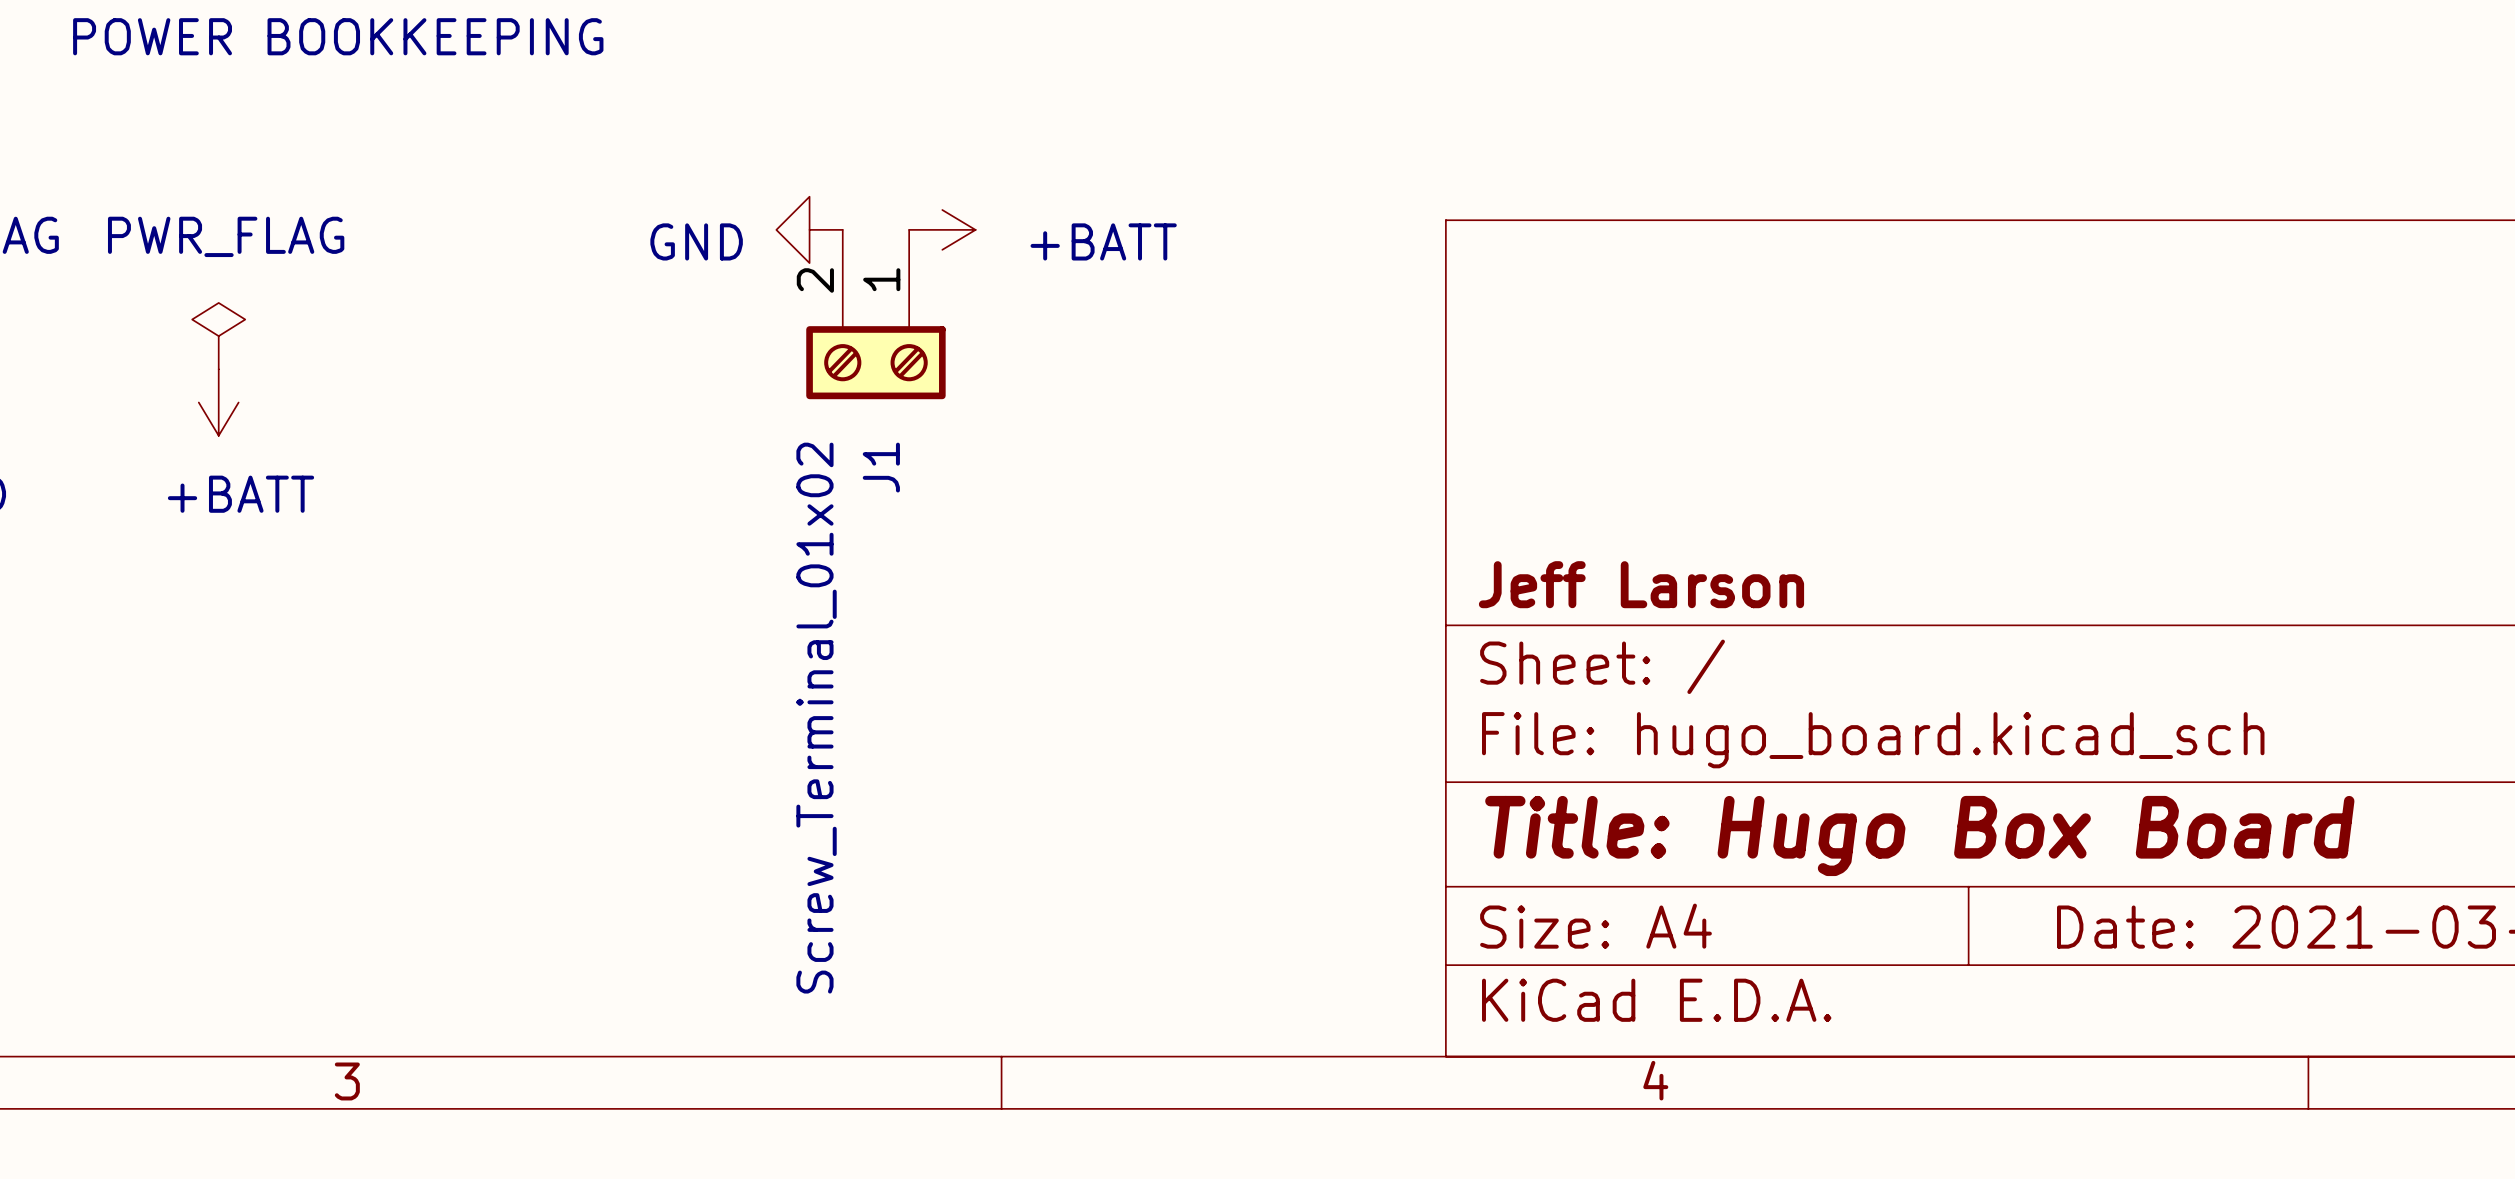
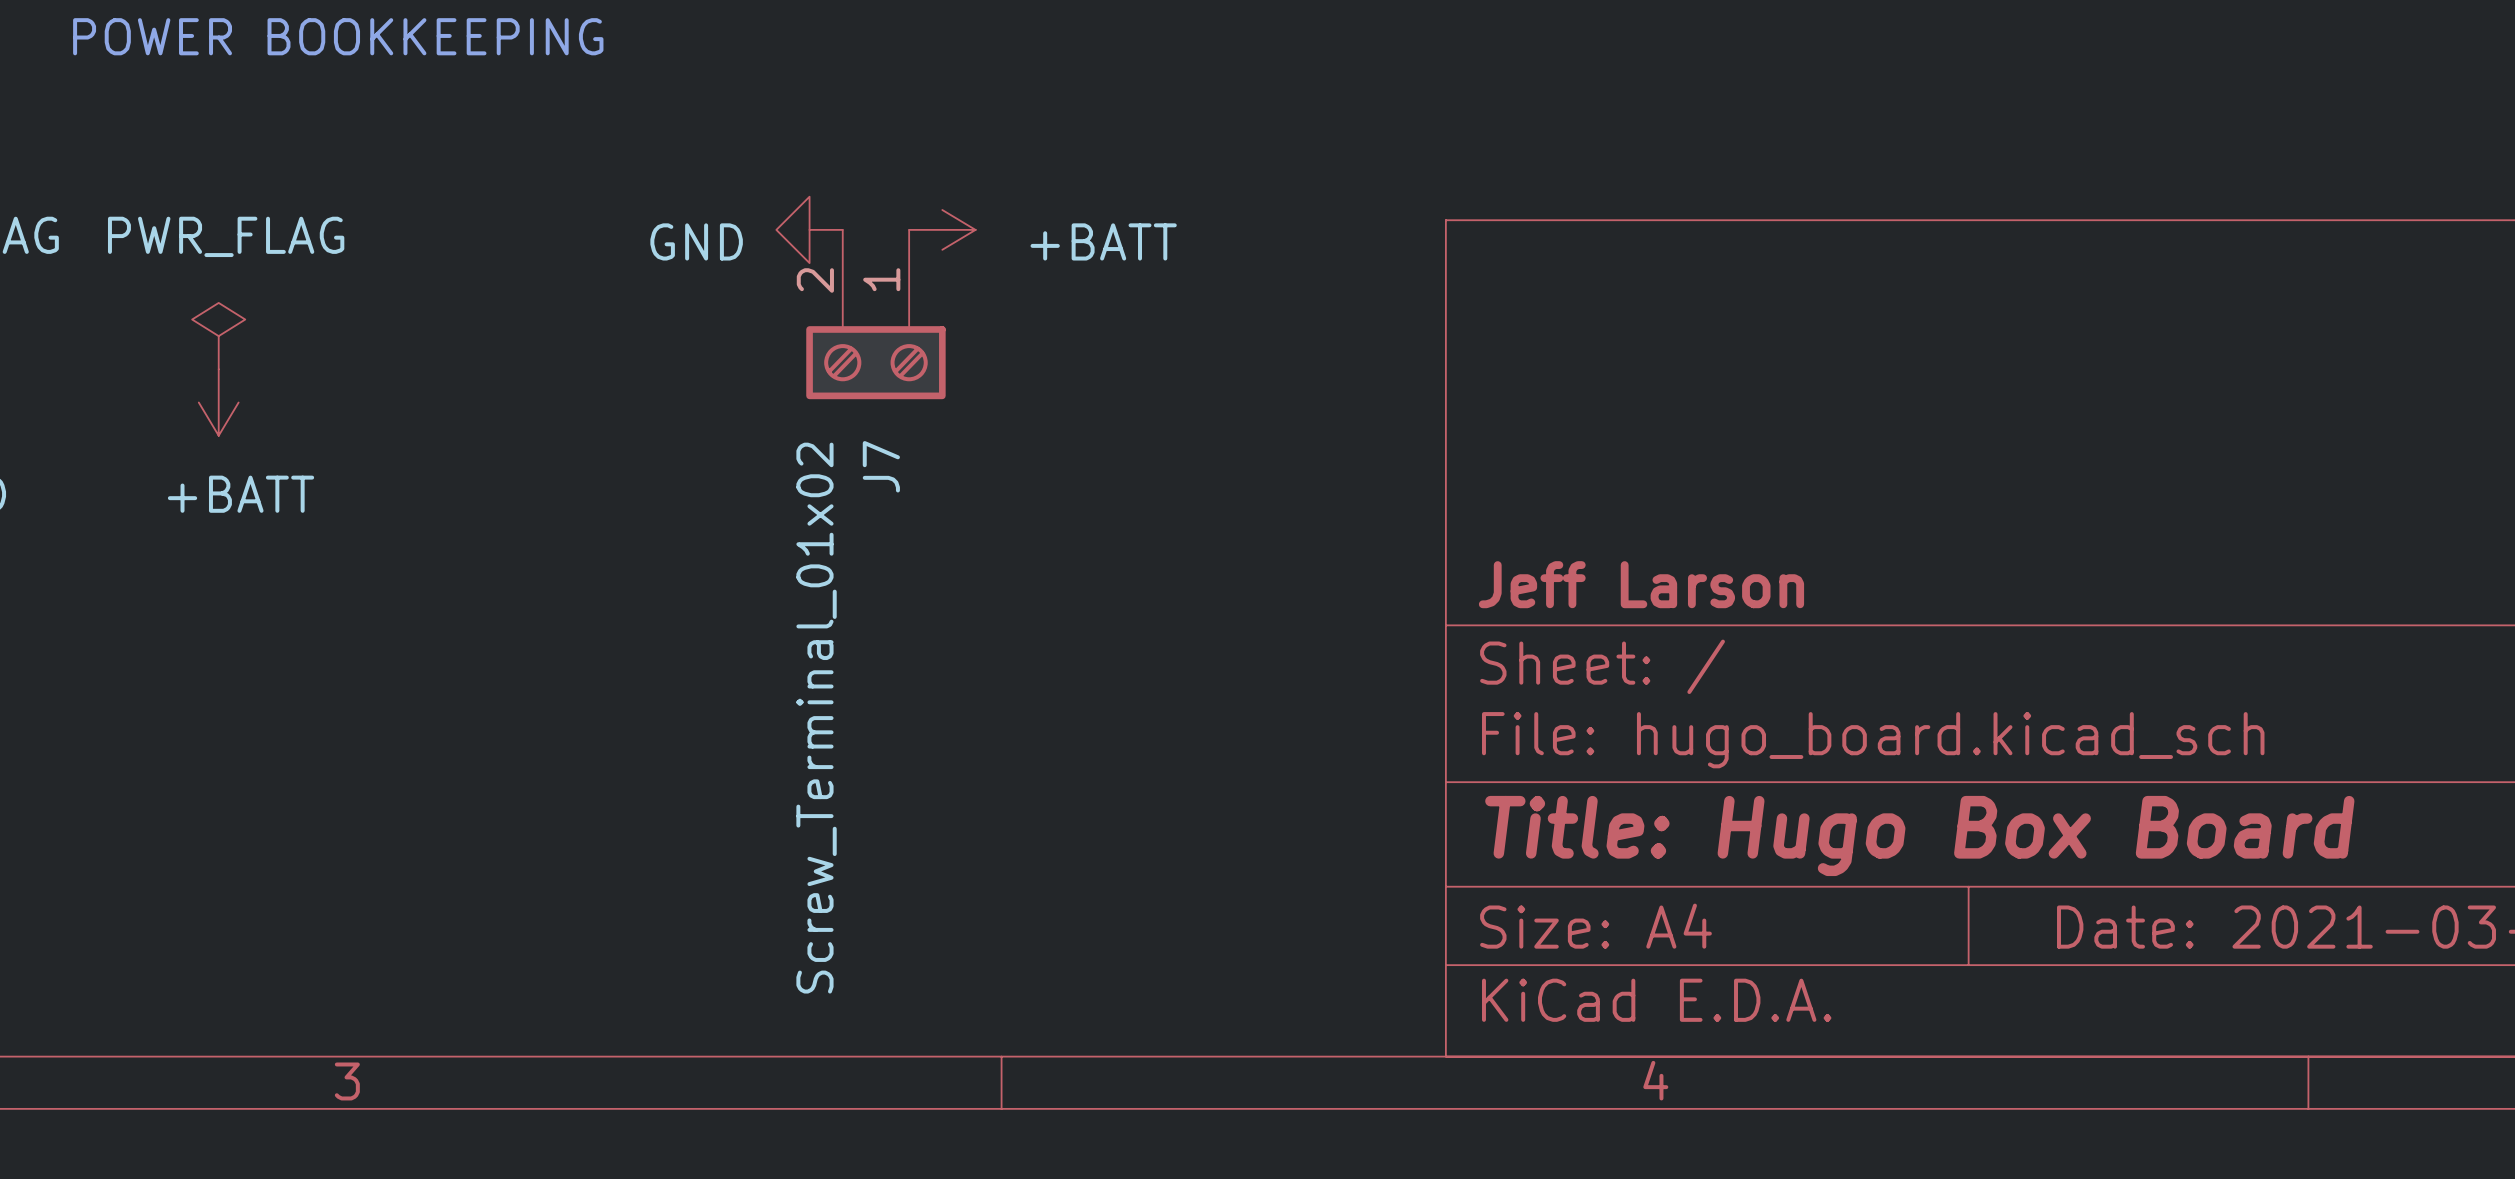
J1 name: J1 (881, 467) -> J7 (881, 466)

